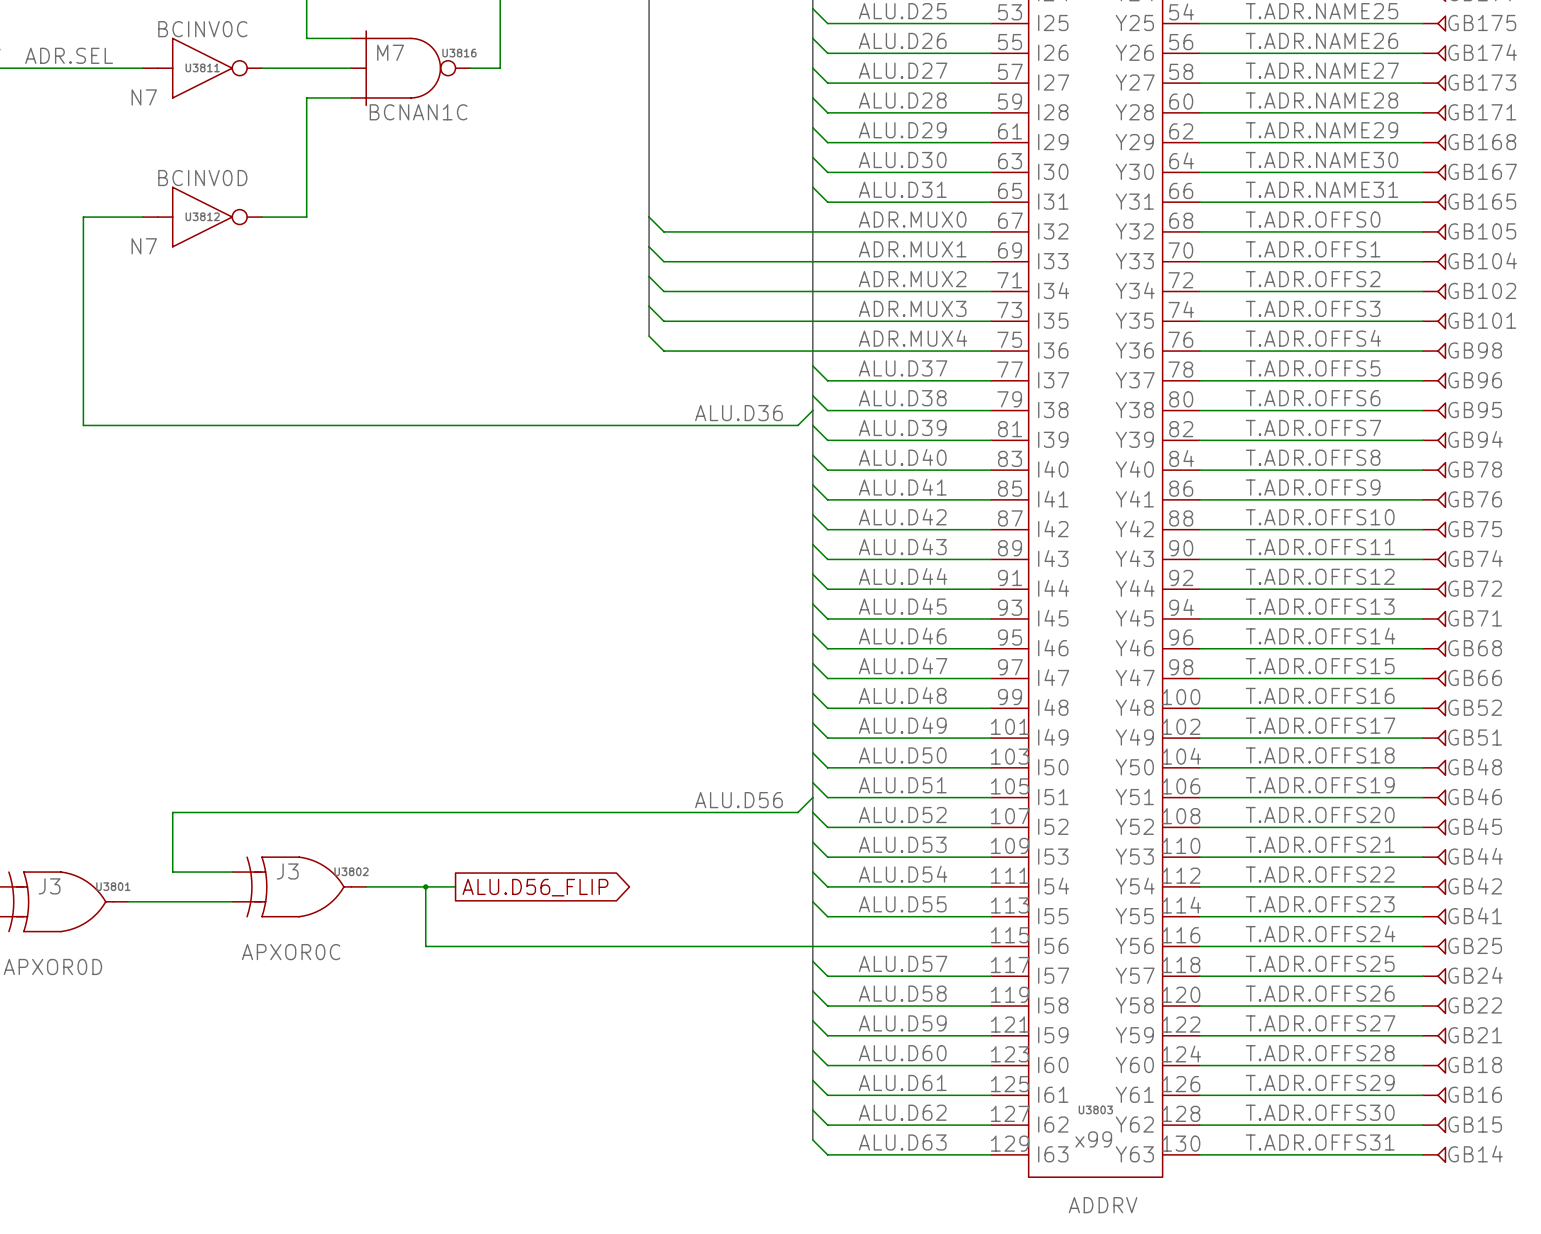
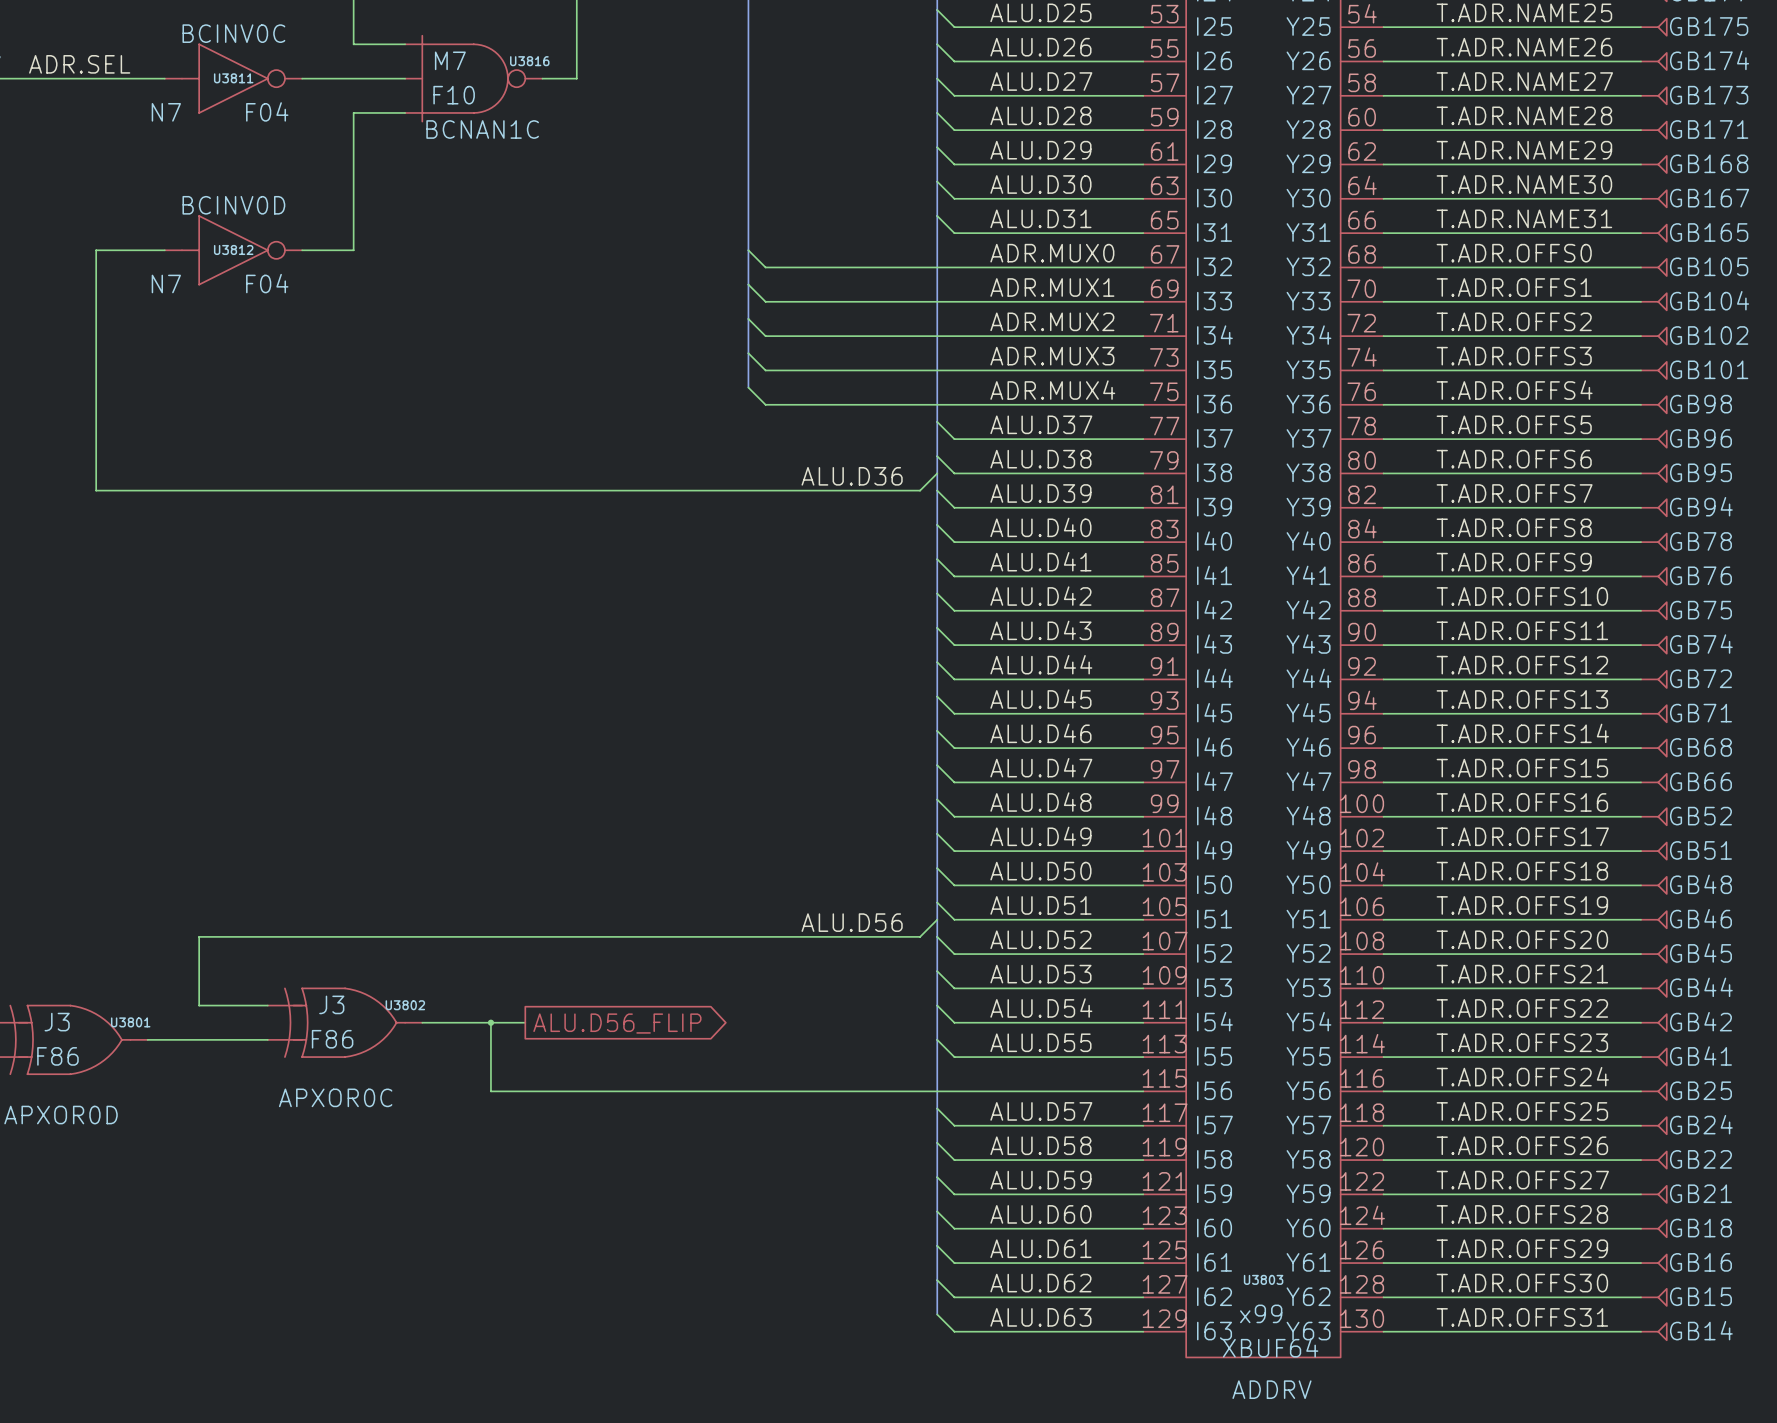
U3816 value: none -> F10 (454, 95)
U3811 value: none -> F04 (267, 111)
U3812 value: none -> F04 (267, 283)
U3802 value: none -> F86 (332, 1039)
U3801 value: none -> F86 (57, 1056)
U3803 value: none -> XBUF64 (1270, 1347)

